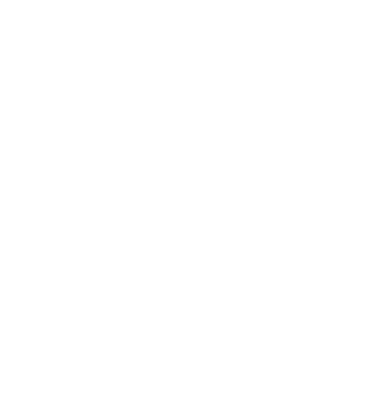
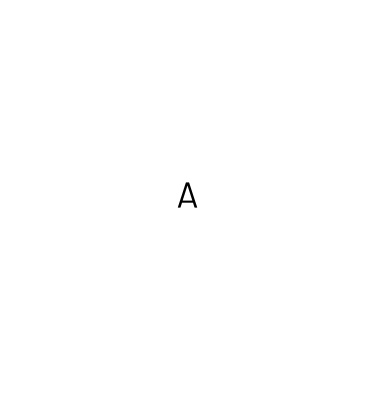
text: none -> A (187, 195)

